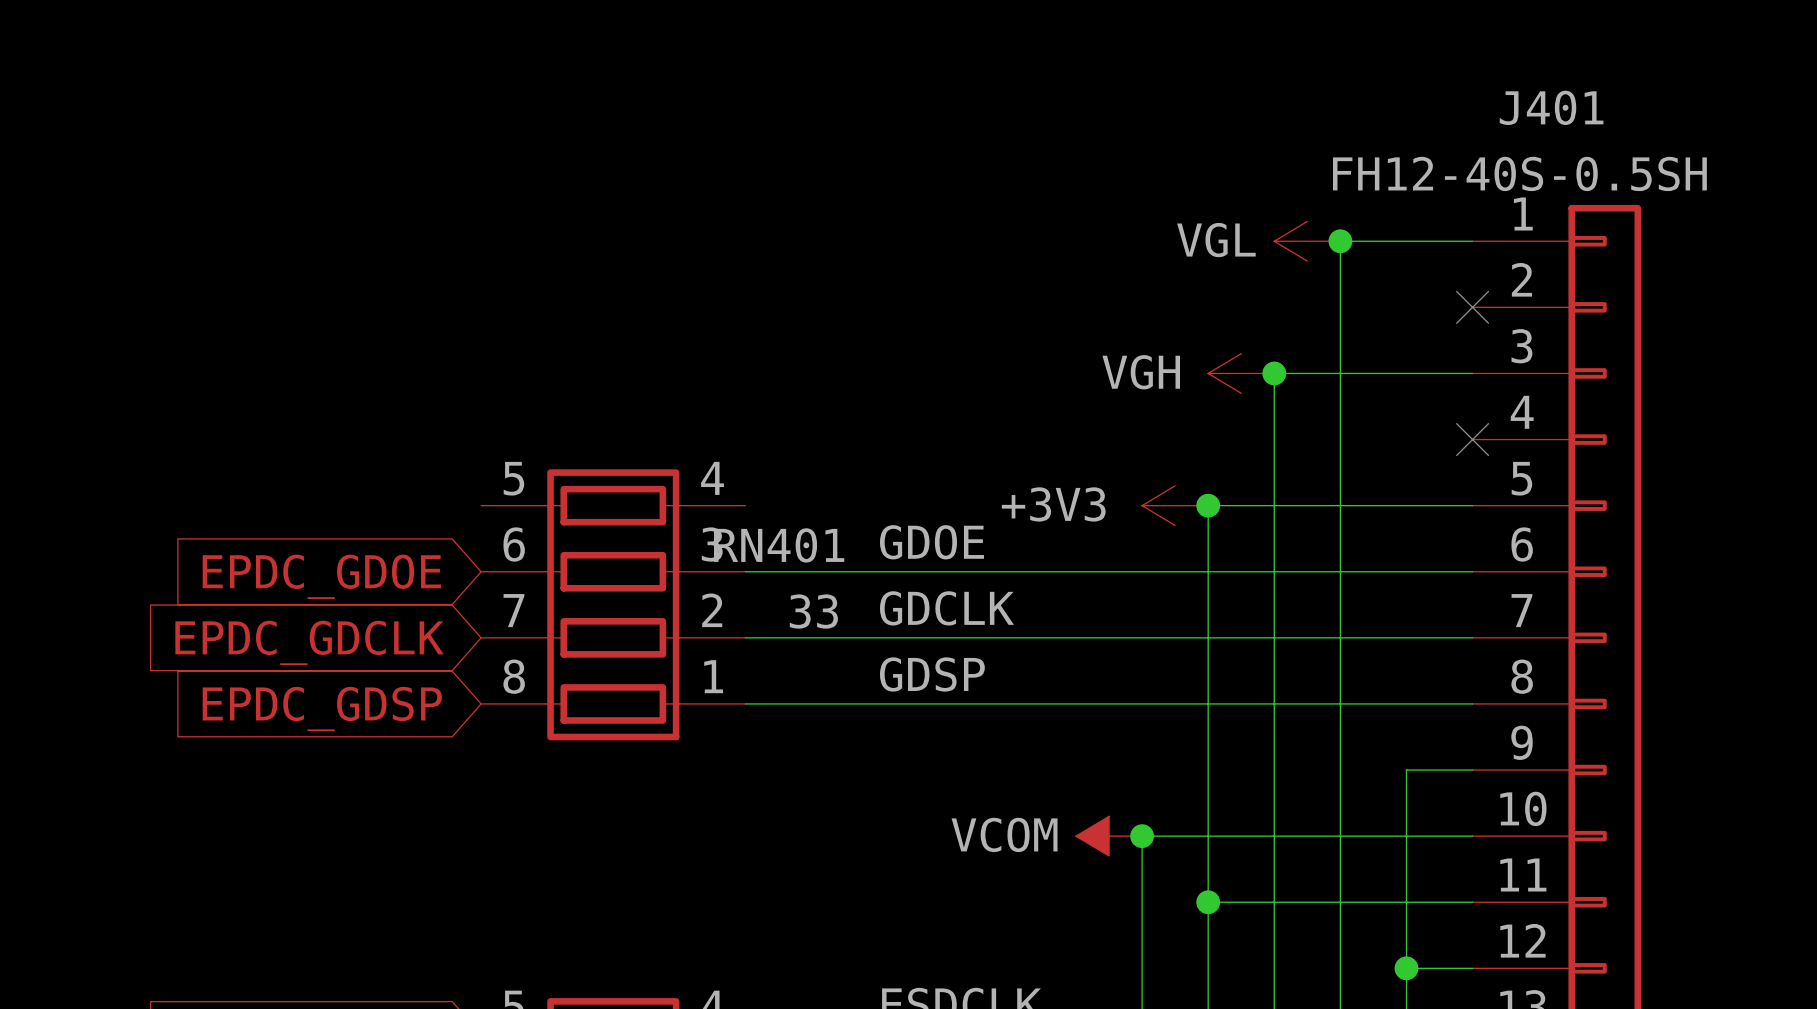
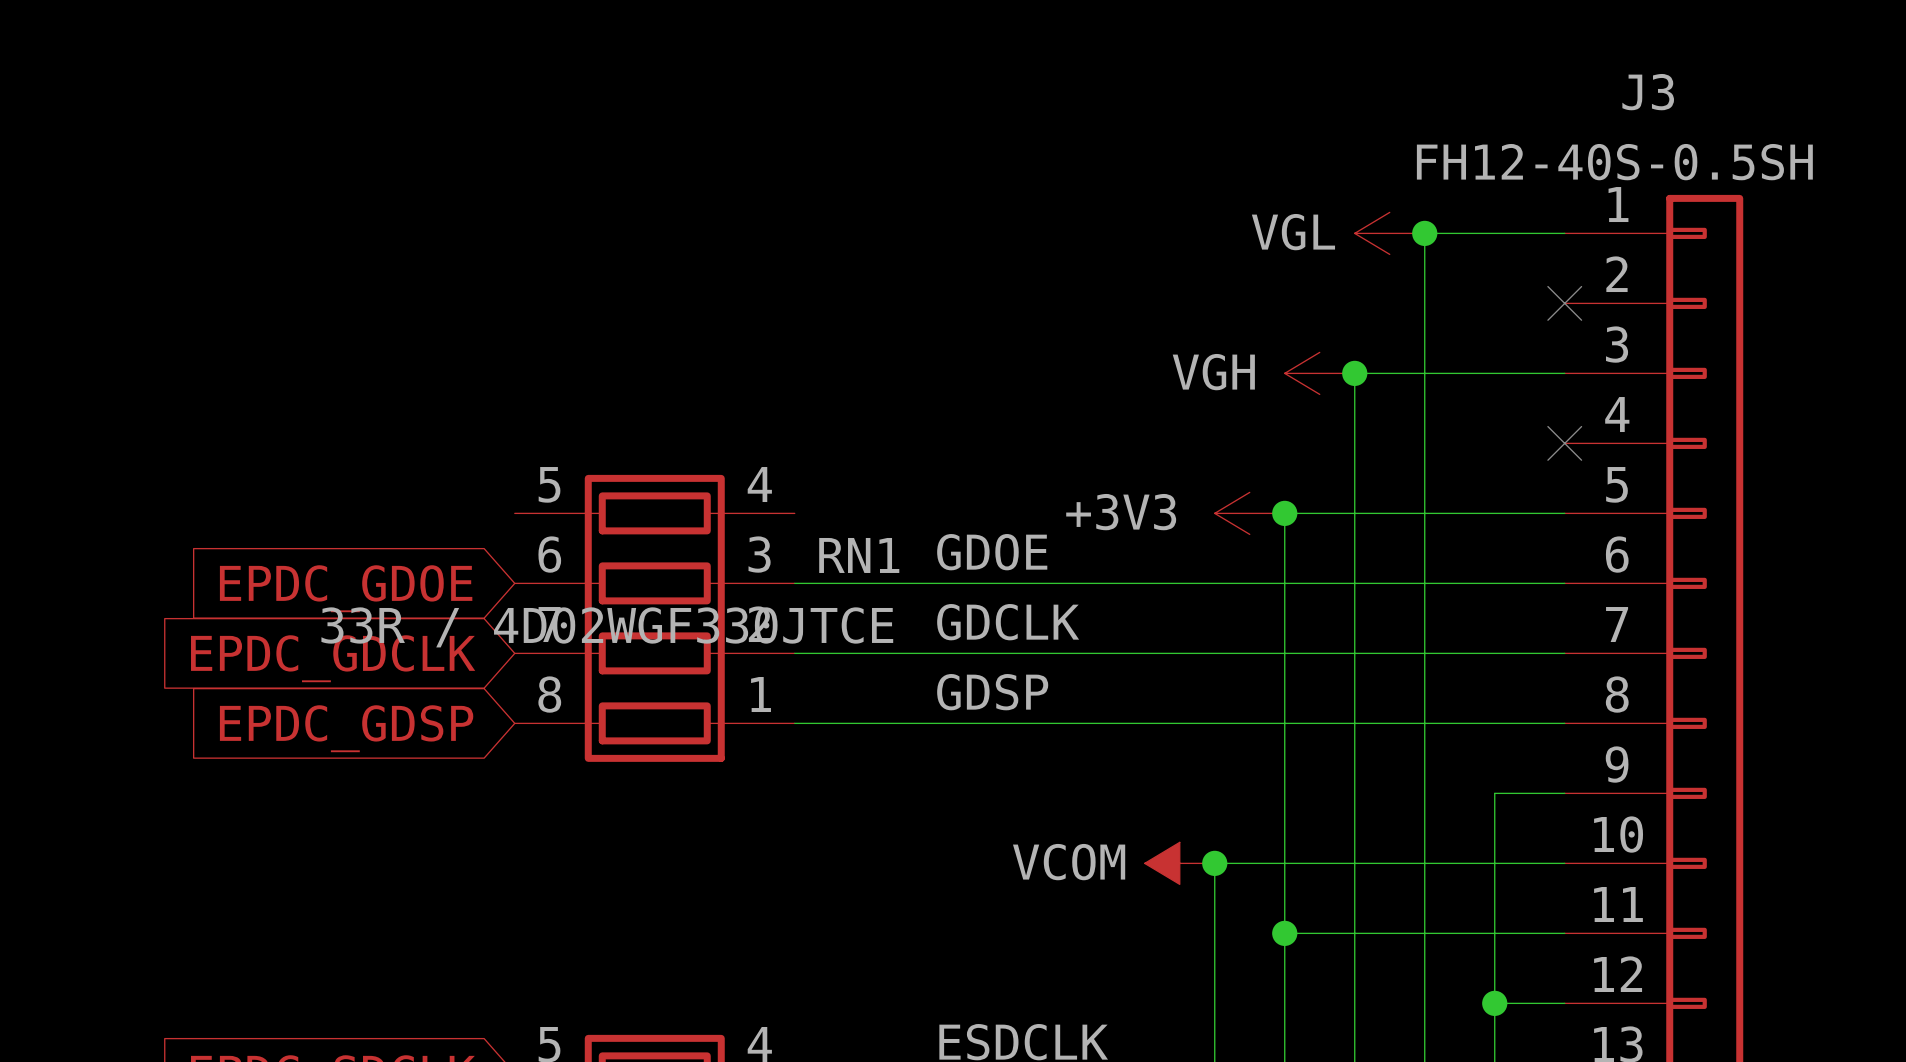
J401 name: J401 (1551, 107) -> J3 (1648, 92)
RN401 name: RN401 (779, 545) -> RN1 (859, 555)
RN401 value: 33 (813, 611) -> 33R / 4D02WGF330JTCE (607, 627)

